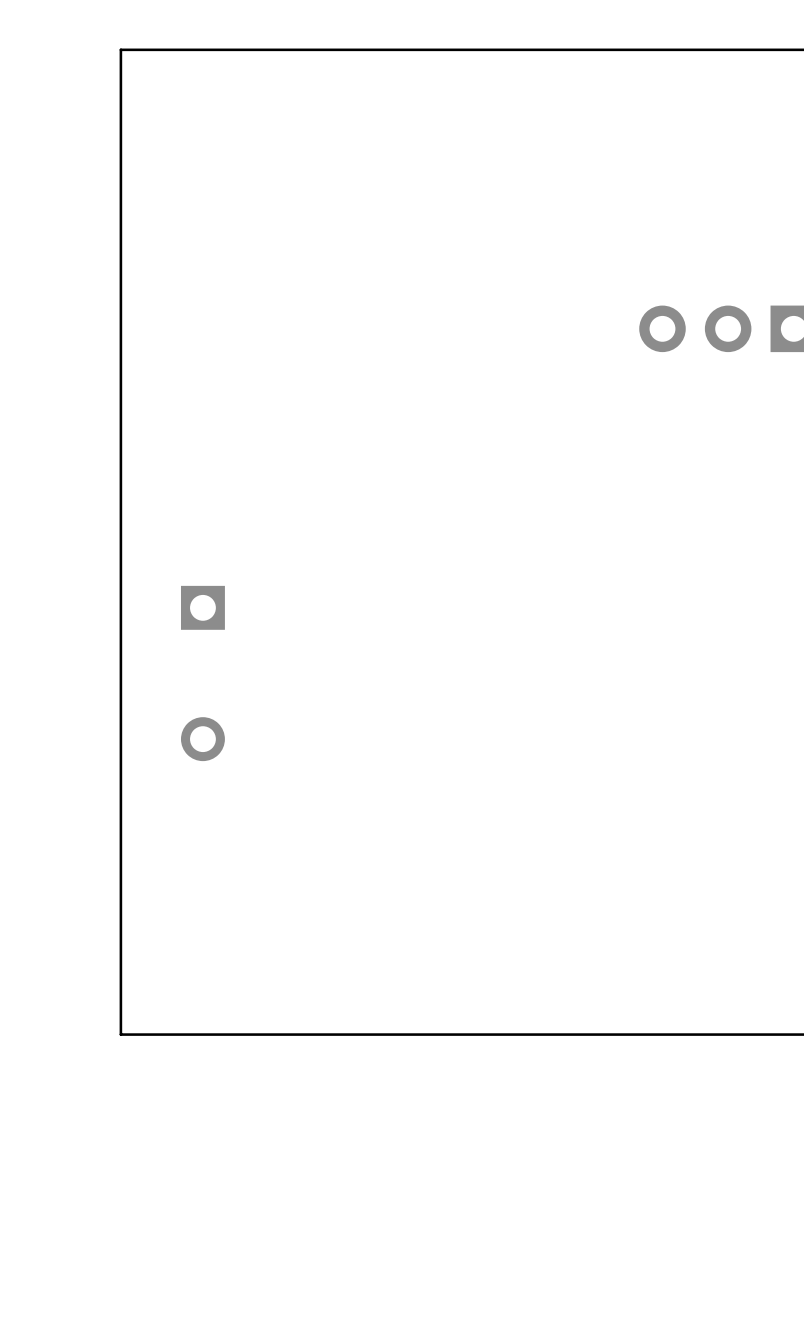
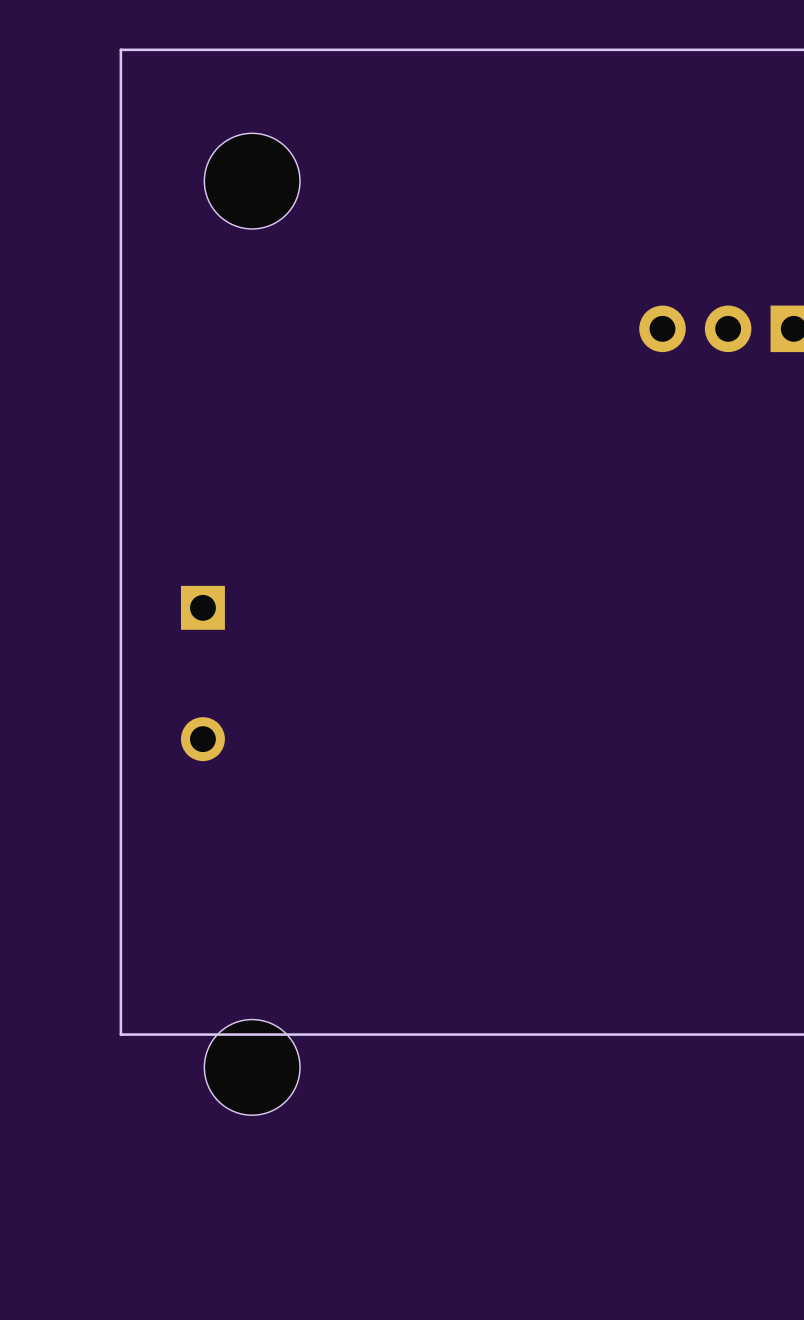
part: none -> (252, 181)
part: none -> (252, 1067)

